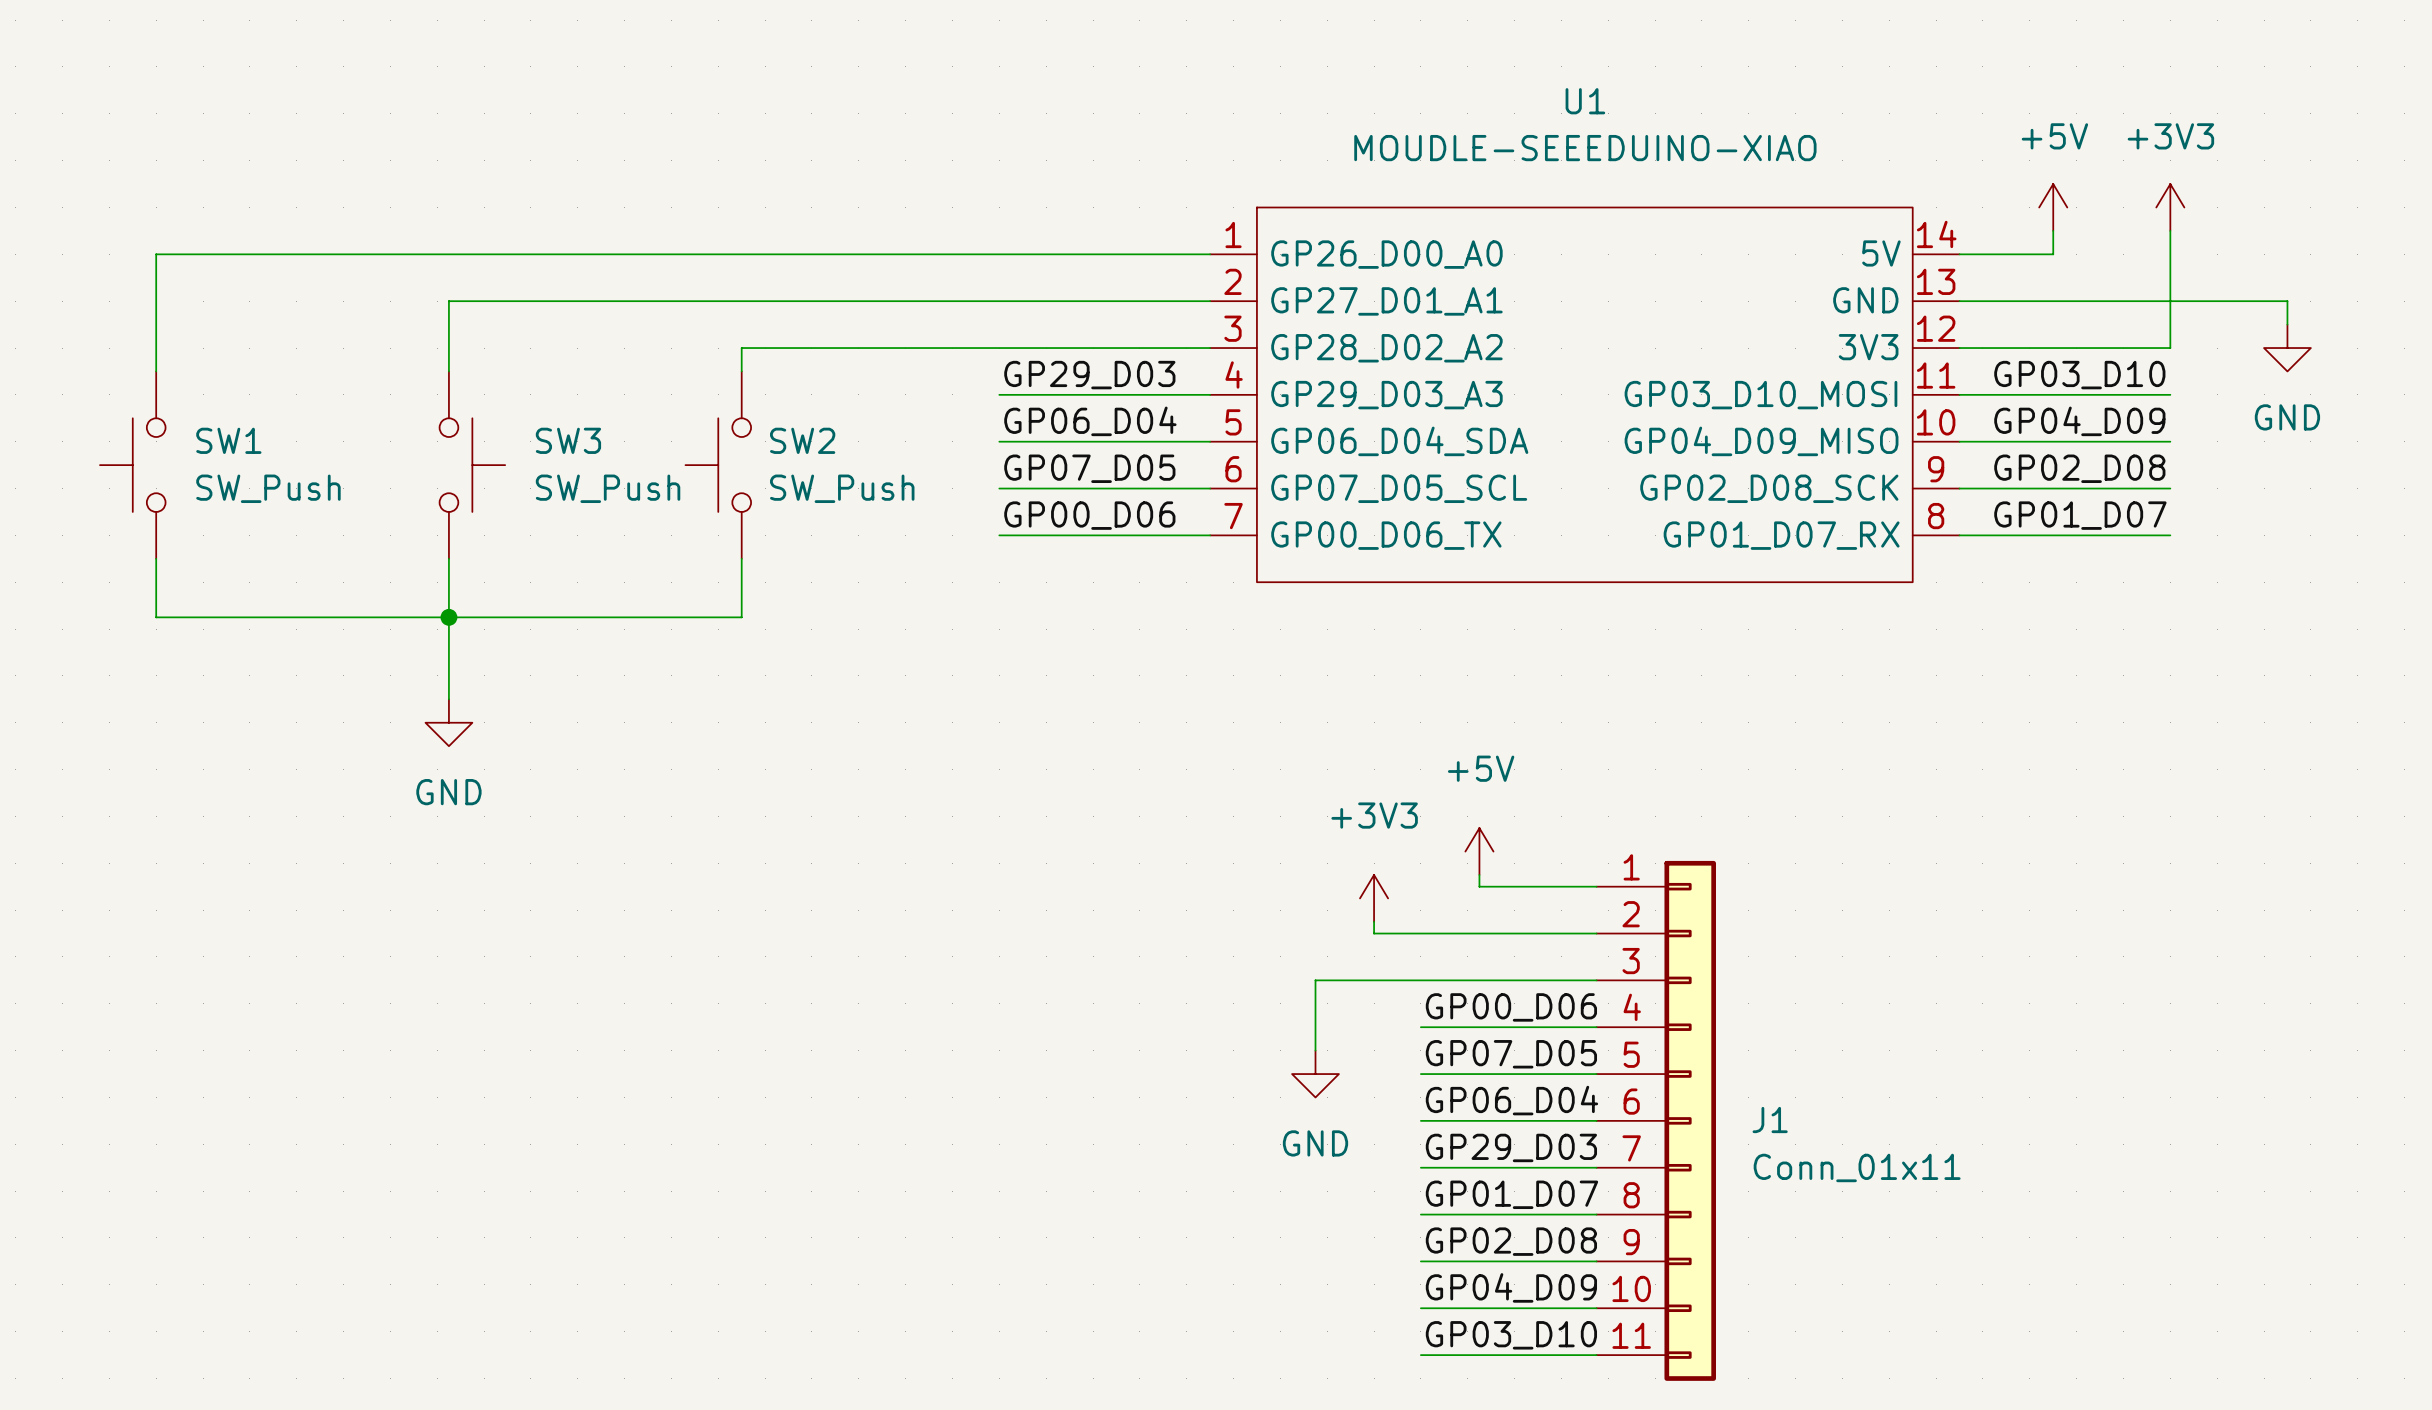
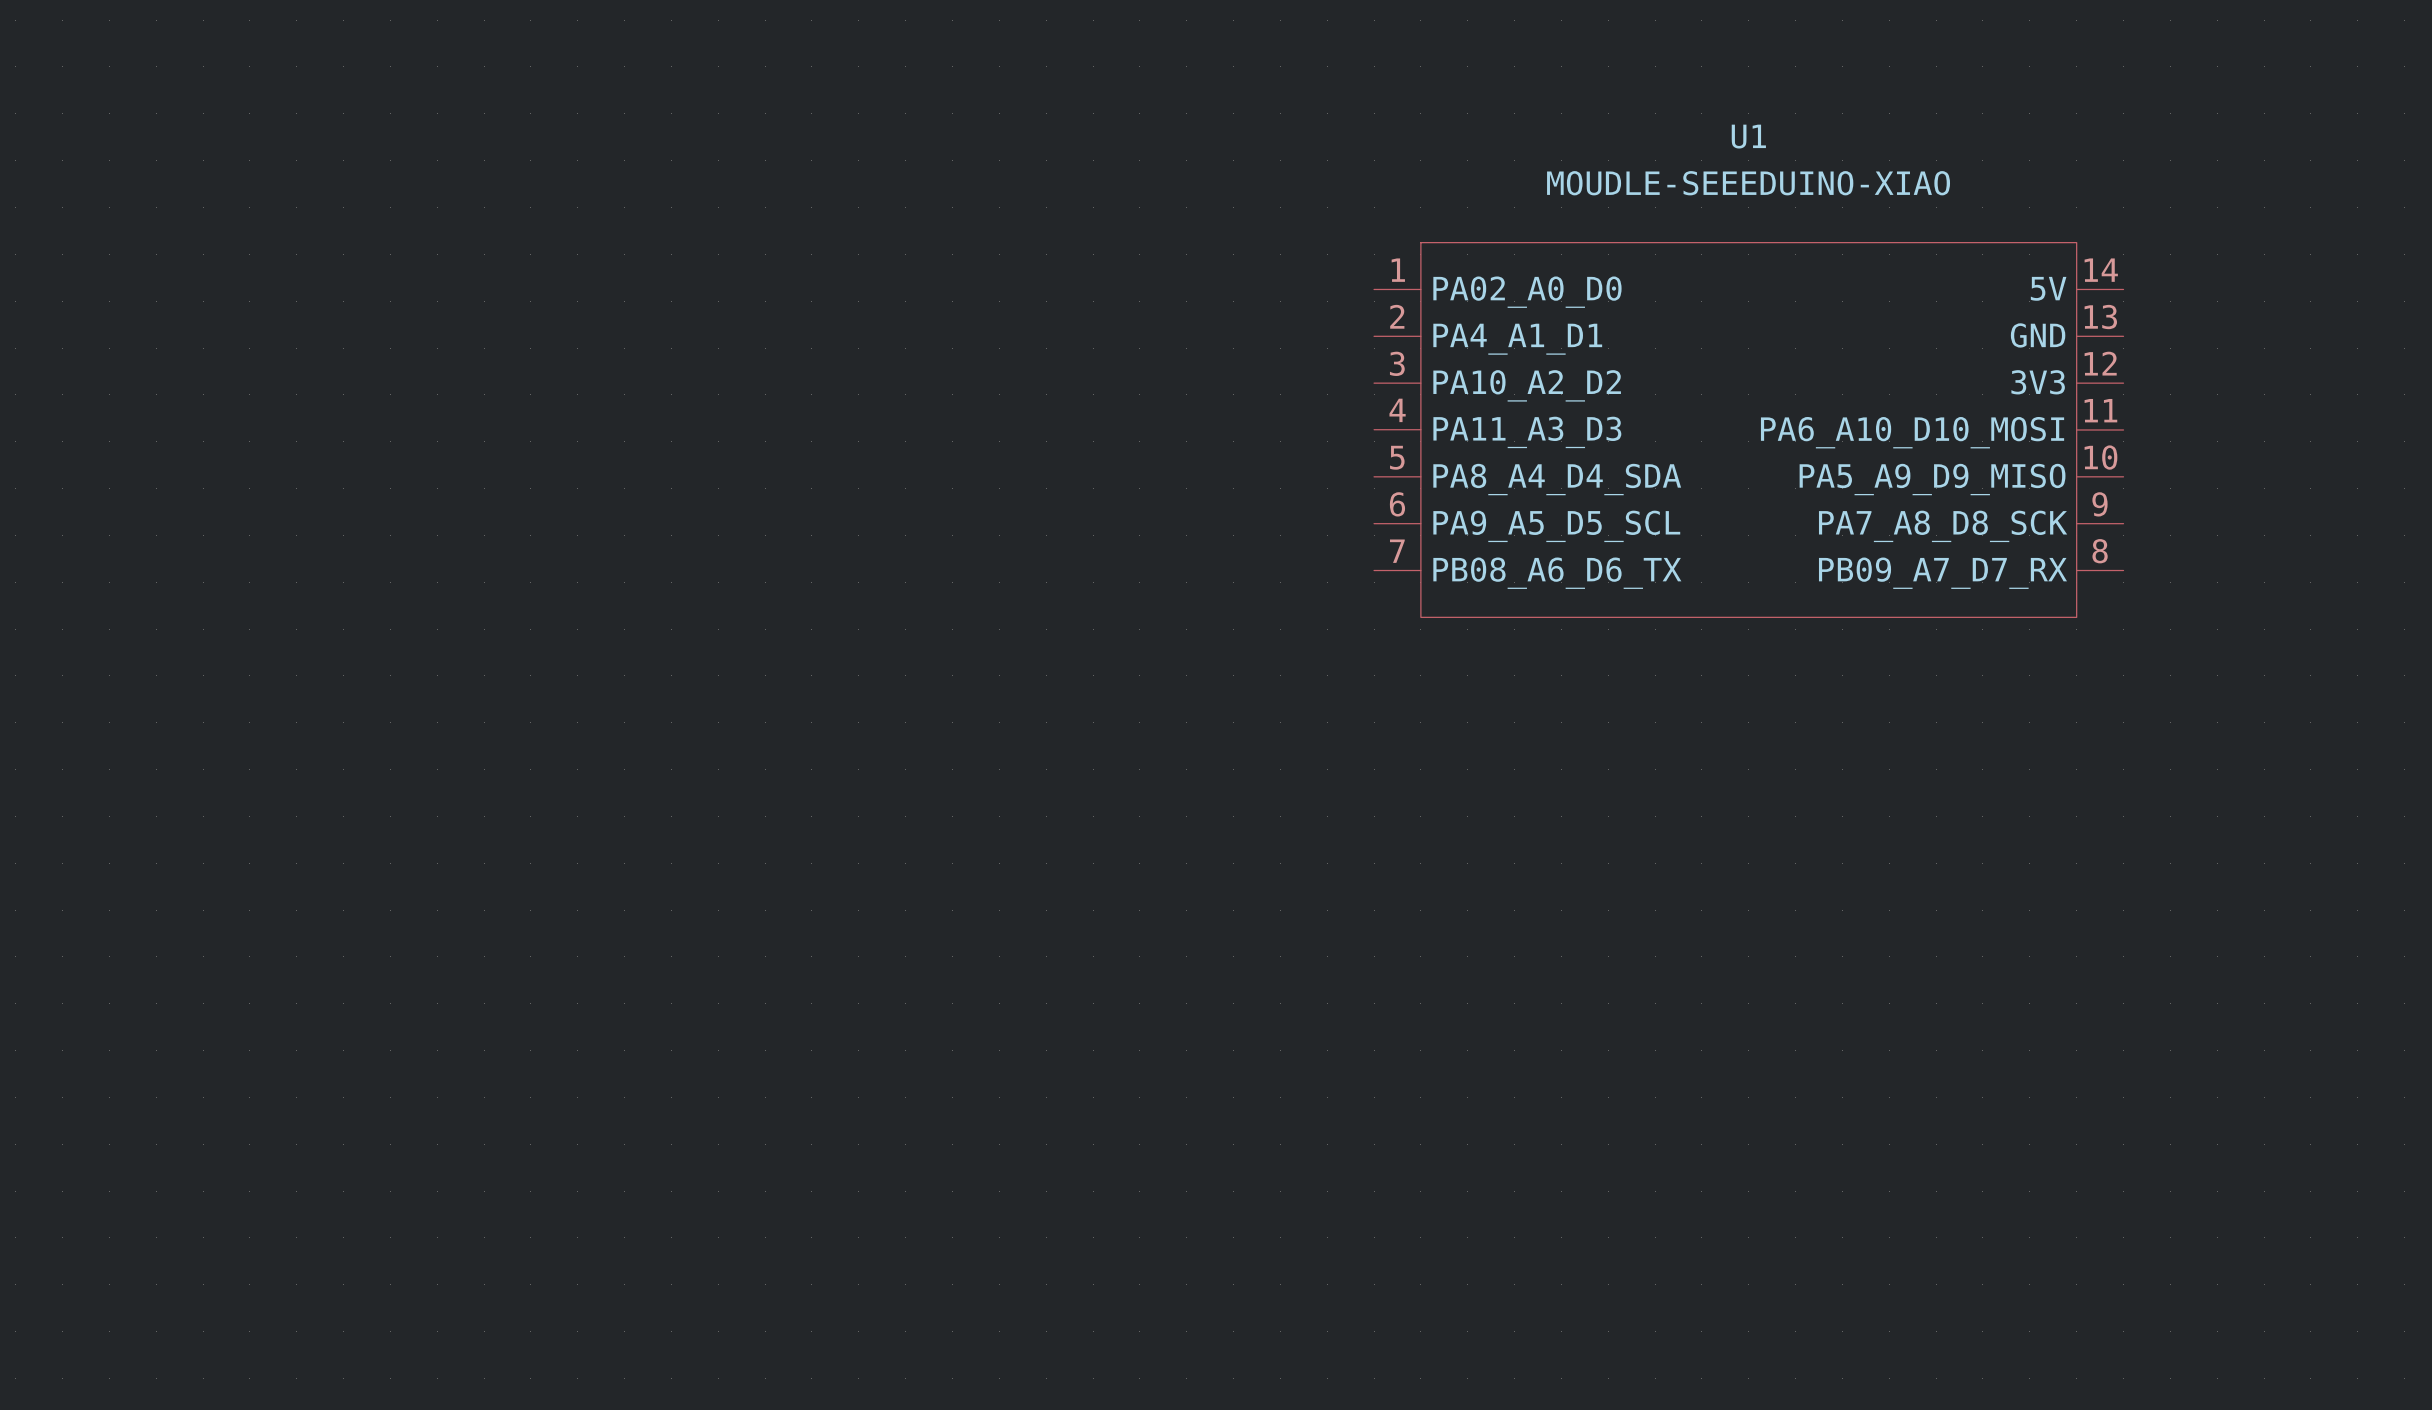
U1 symbol: [1210, 207, 1960, 583] -> [1374, 242, 2124, 618]
power symbol: +5V (2053, 207) -> none
power symbol: +3V3 (2170, 207) -> none
wire: (2053, 230) (2053, 254) (1959, 254) -> none
wire: (2170, 230) (2170, 348) (1959, 348) -> none
wire: (1210, 254) (156, 254) (156, 371) -> none
wire: (1210, 301) (448, 301) (448, 371) -> none
wire: (1959, 301) (2287, 301) (2287, 324) -> none
wire: (1210, 348) (741, 348) (741, 371) -> none
power symbol: GND (2287, 348) -> none
label: GP29_D03 (1089, 375) -> none
label: GP03_D10 (2079, 375) -> none
wire: (999, 394) (1210, 394) -> none
wire: (1959, 394) (2170, 394) -> none
label: GP06_D04 (1090, 421) -> none
label: GP04_D09 (2079, 421) -> none
wire: (999, 441) (1210, 441) -> none
wire: (1959, 441) (2170, 441) -> none
SW1: SW_Push (132, 465) -> none
SW3: SW_Push (472, 465) -> none
SW2: SW_Push (718, 465) -> none
label: GP07_D05 (1089, 468) -> none
label: GP02_D08 (2079, 468) -> none
wire: (999, 488) (1210, 488) -> none
wire: (1959, 488) (2170, 488) -> none
label: GP00_D06 (1089, 515) -> none
label: GP01_D07 (2080, 515) -> none
wire: (999, 535) (1210, 535) -> none
wire: (1959, 535) (2170, 535) -> none
wire: (156, 558) (156, 617) (741, 617) (741, 558) -> none
wire: (448, 558) (448, 699) -> none
junction: (448, 617) -> none
power symbol: GND (448, 722) -> none
power symbol: +5V (1479, 851) -> none
wire: (1479, 874) (1479, 886) (1596, 886) -> none
power symbol: +3V3 (1374, 898) -> none
wire: (1374, 921) (1374, 933) (1596, 933) -> none
wire: (1596, 980) (1315, 980) (1315, 1050) -> none
label: GP00_D06 (1511, 1007) -> none
wire: (1420, 1027) (1596, 1027) -> none
label: GP07_D05 (1511, 1054) -> none
power symbol: GND (1315, 1074) -> none
wire: (1420, 1074) (1596, 1074) -> none
label: GP06_D04 (1511, 1100) -> none
wire: (1420, 1120) (1596, 1120) -> none
J1: Conn_01x11 (1656, 1120) -> none
label: GP29_D03 (1511, 1147) -> none
wire: (1420, 1167) (1596, 1167) -> none
label: GP01_D07 (1511, 1194) -> none
wire: (1420, 1214) (1596, 1214) -> none
label: GP02_D08 (1511, 1241) -> none
wire: (1420, 1261) (1596, 1261) -> none
label: GP04_D09 (1511, 1287) -> none
wire: (1420, 1308) (1596, 1308) -> none
label: GP03_D10 (1511, 1335) -> none
wire: (1420, 1355) (1596, 1355) -> none

